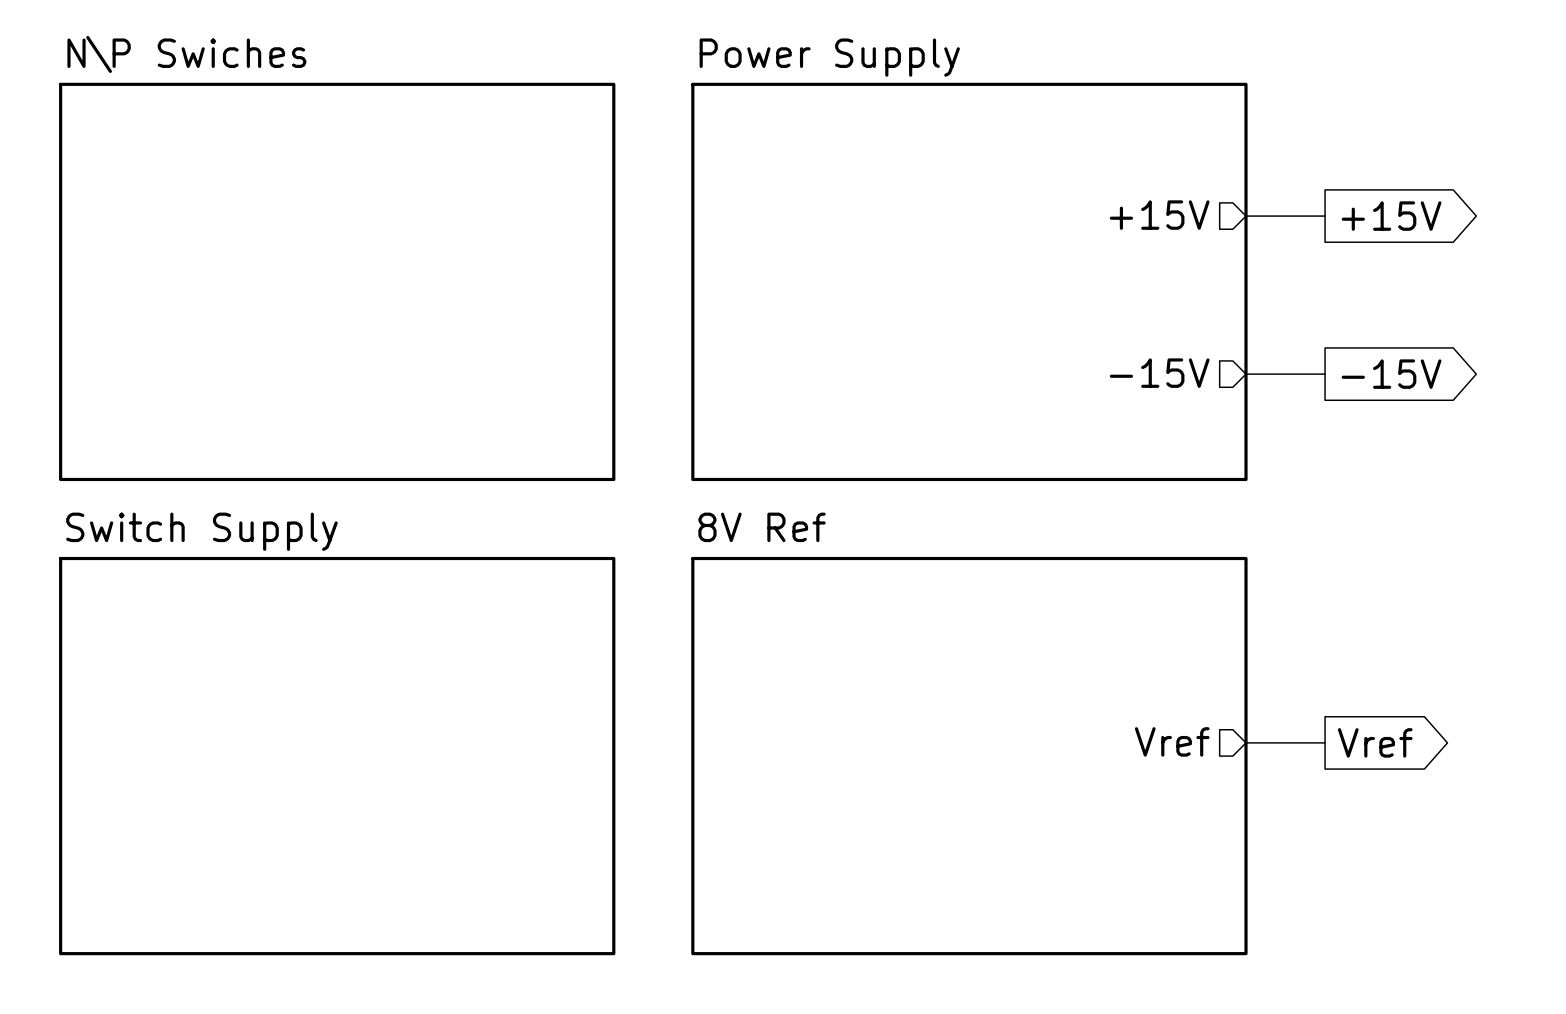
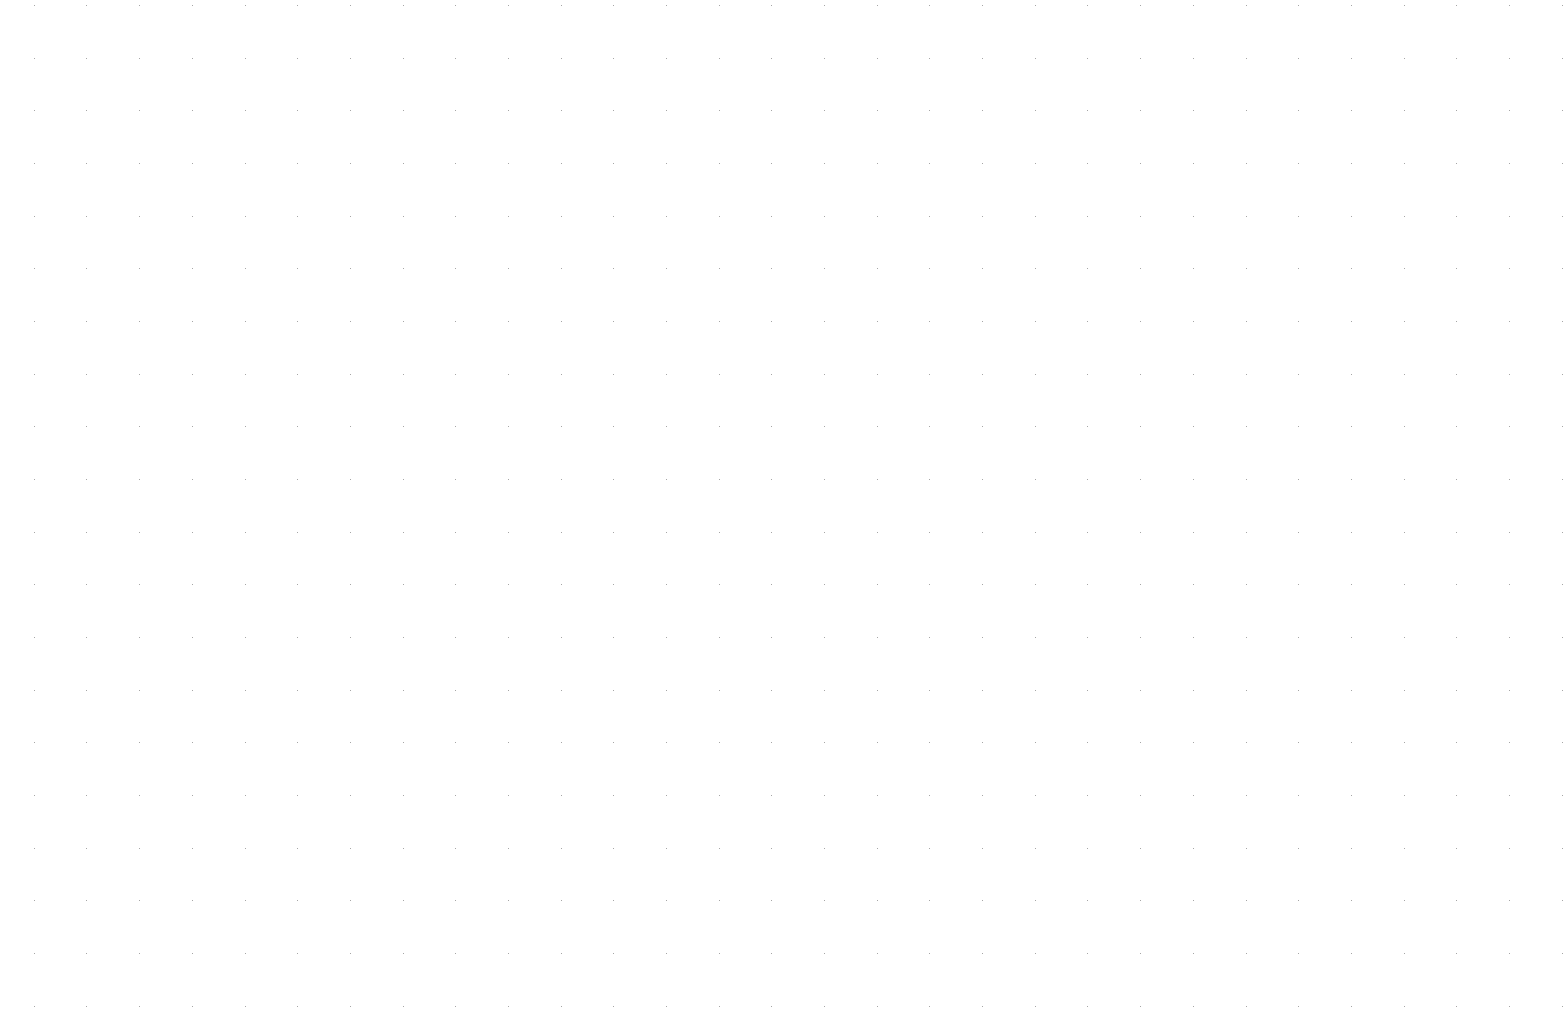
sheet pin: +15V (1159, 215) -> none
wire: (1246, 216) (1325, 216) -> none
global label: +15V (1391, 216) -> none
sheet N\P Swiches: (337, 281) -> none
sheet Power Supply: (969, 281) -> none
sheet pin: -15V (1159, 373) -> none
wire: (1246, 374) (1325, 374) -> none
global label: -15V (1391, 374) -> none
sheet pin: Vref (1172, 741) -> none
wire: (1246, 742) (1325, 742) -> none
global label: Vref (1375, 742) -> none
sheet Switch Supply: (337, 756) -> none
sheet 8V Ref: (969, 756) -> none

